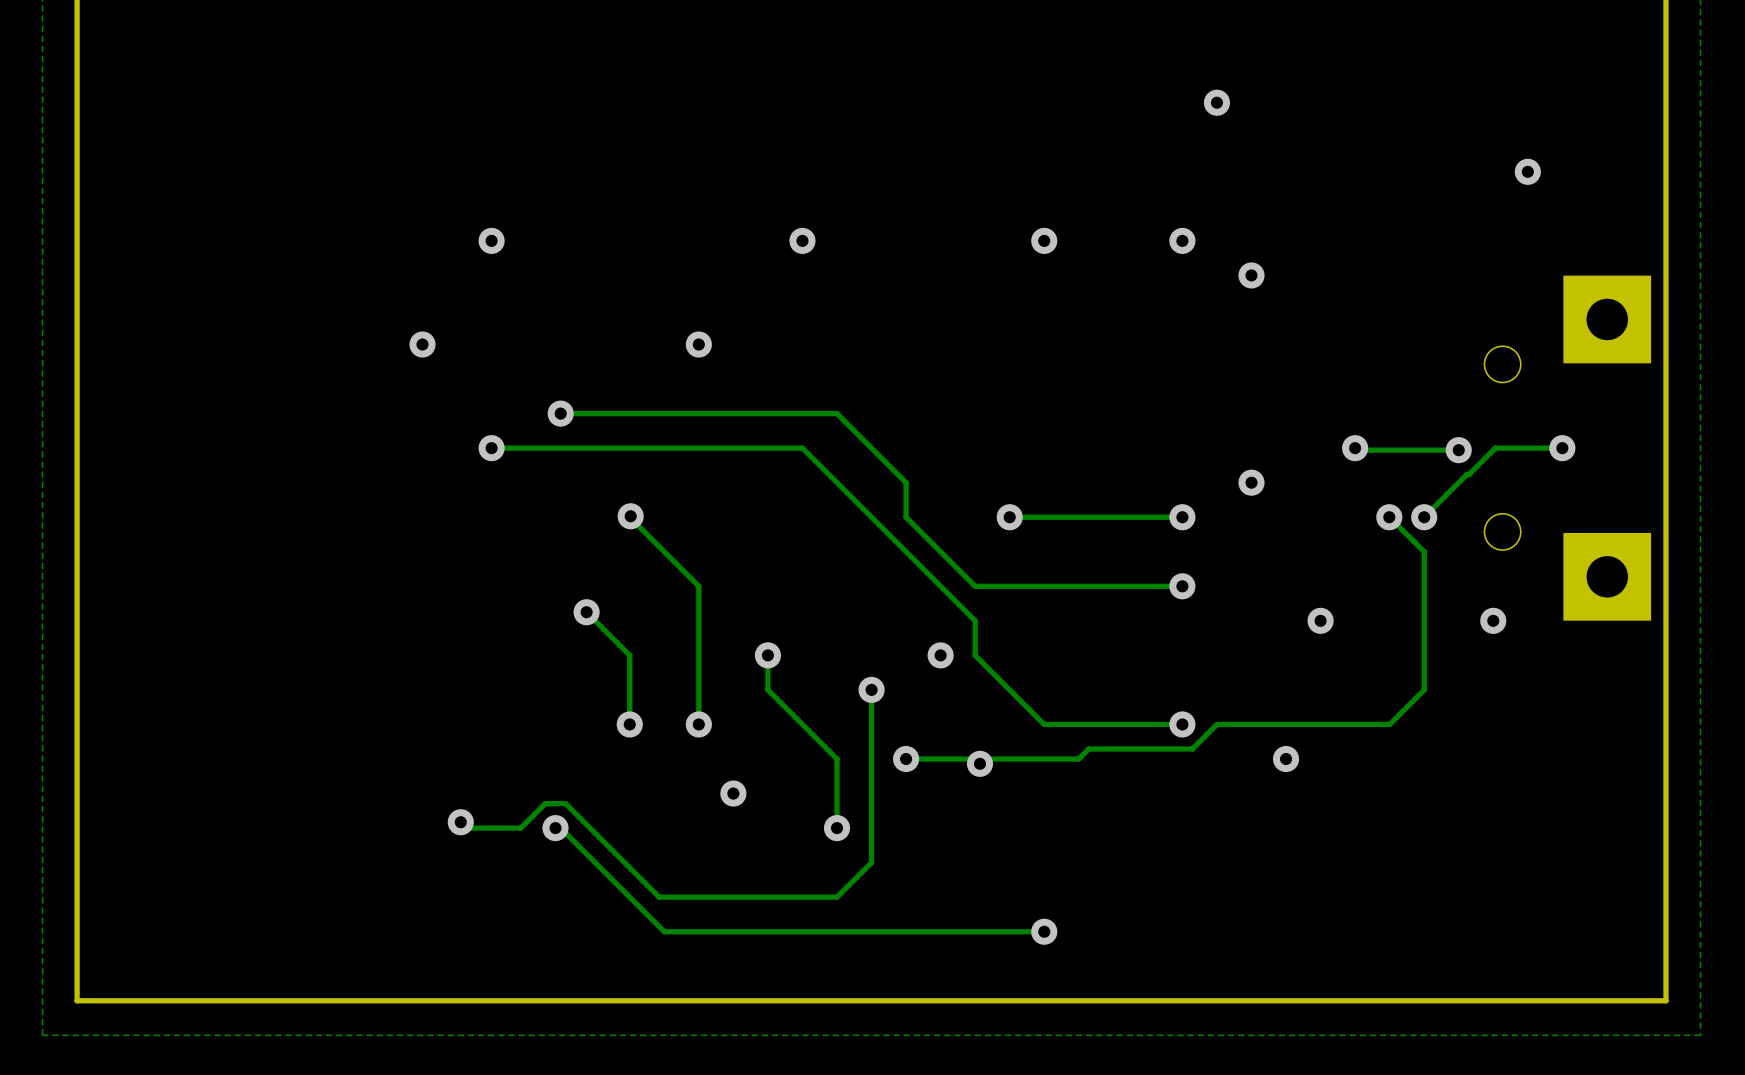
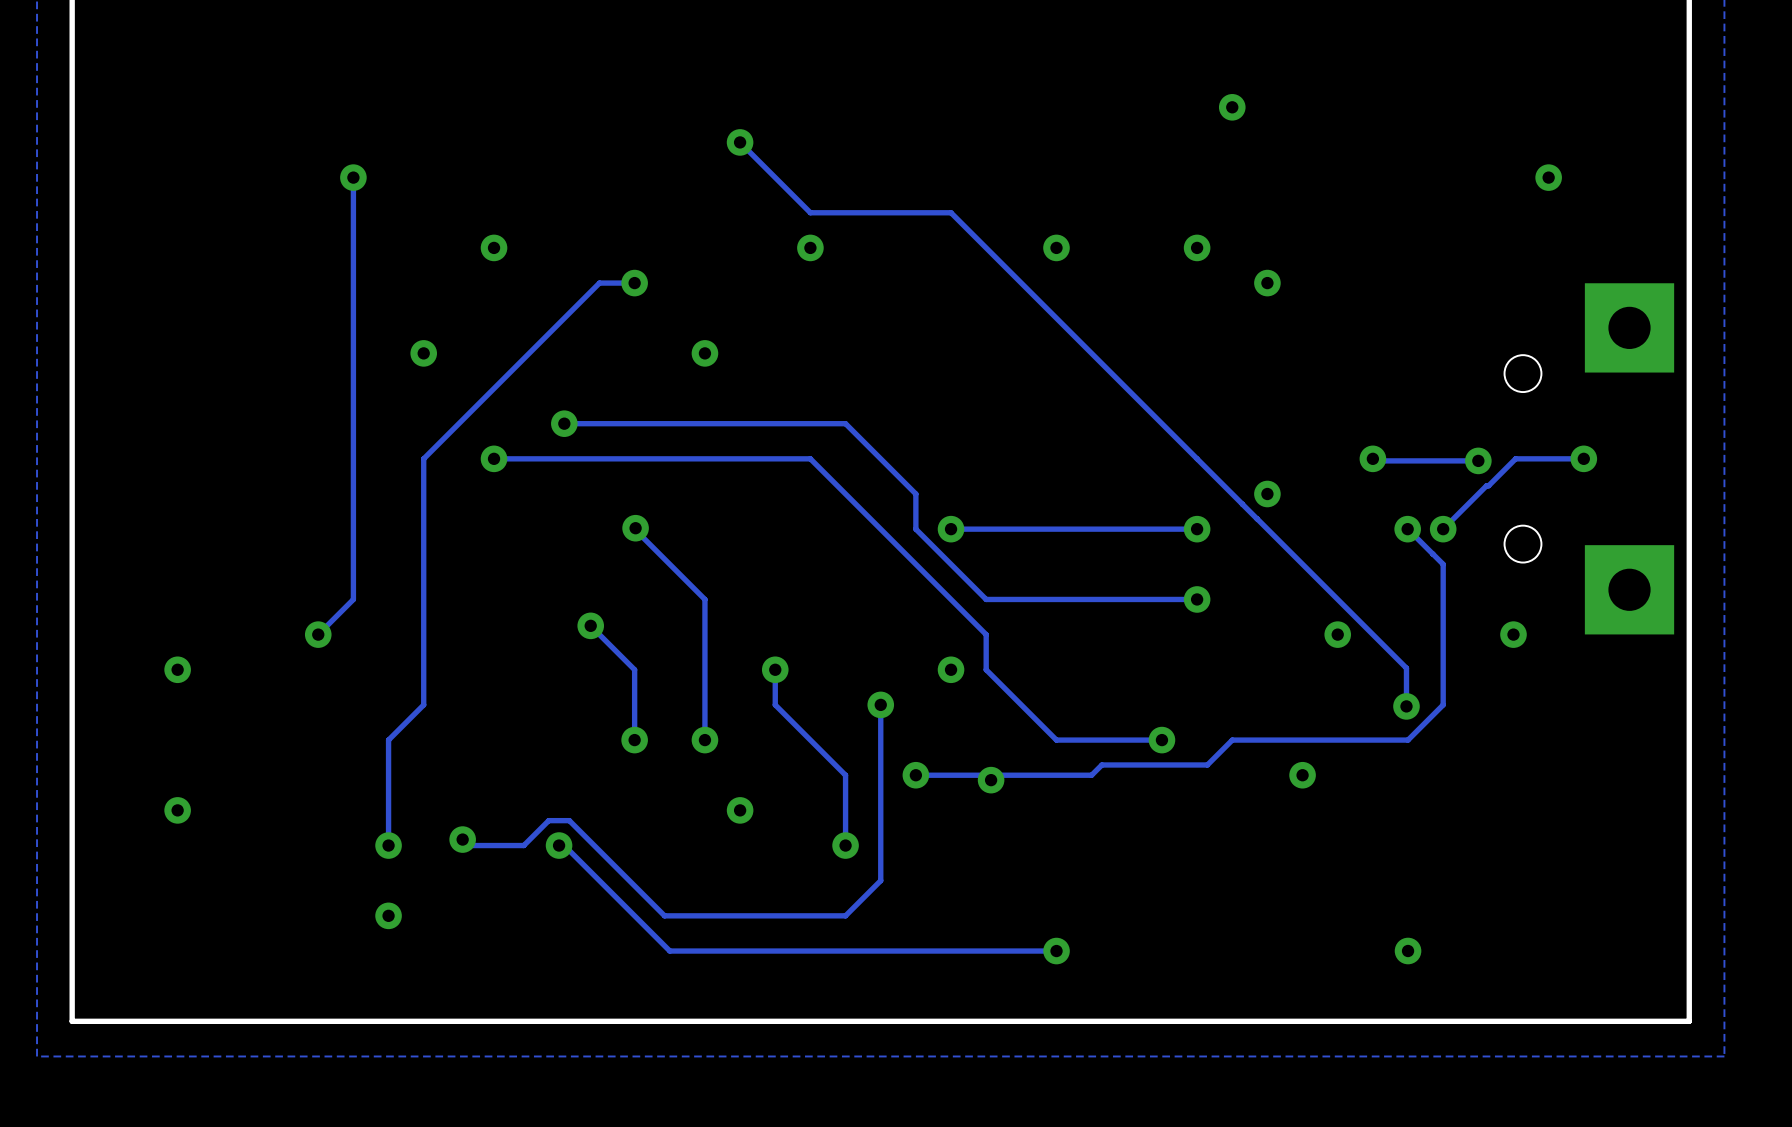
track: none -> (740, 142) (810, 212) (951, 212) (1406, 668) (1406, 706)
via: none -> (740, 142)
track: none -> (353, 177) (353, 599) (318, 634)
via: none -> (353, 177)
track: none -> (634, 283) (599, 283) (423, 458) (423, 704) (388, 740) (388, 845)
via: none -> (634, 283)
track: none -> (1021, 529) (951, 529)
via position: (1009, 517) -> (951, 529)
via: none -> (318, 634)
via: none -> (177, 669)
via: none -> (1406, 706)
track: (1182, 724) (1147, 724) -> none
via position: (1182, 724) -> (1161, 740)
via: none -> (177, 810)
via: none -> (388, 845)
via: none -> (388, 915)
via: none -> (1408, 951)

